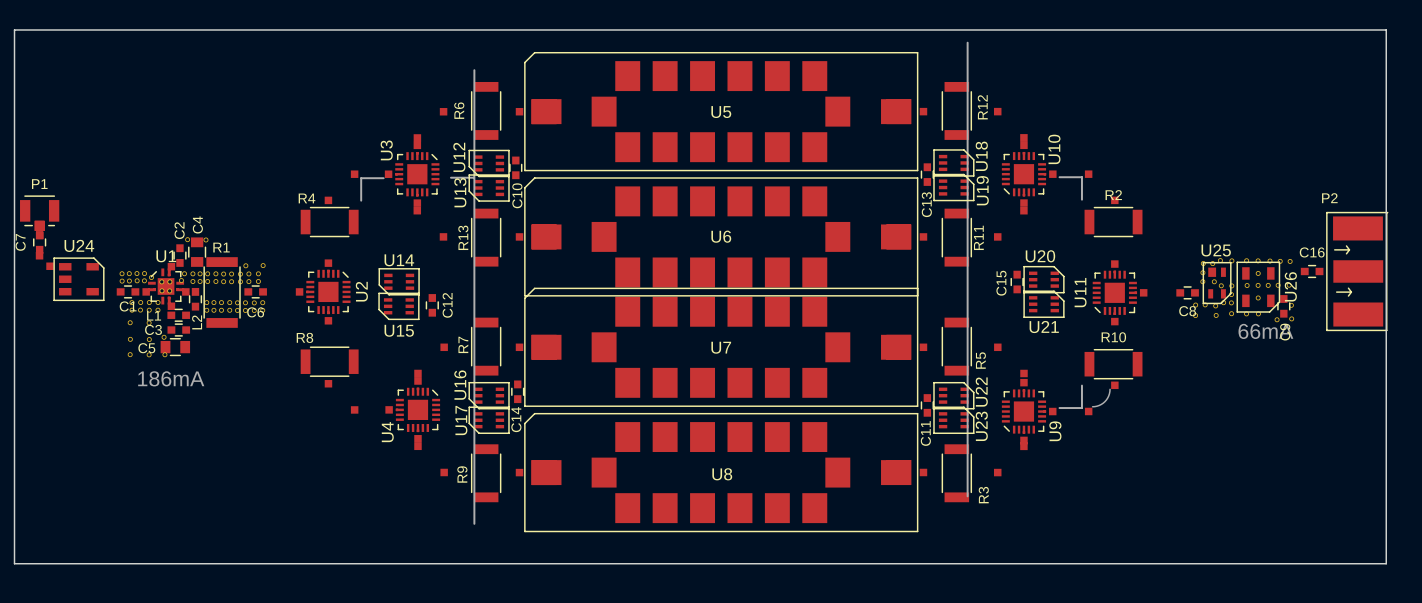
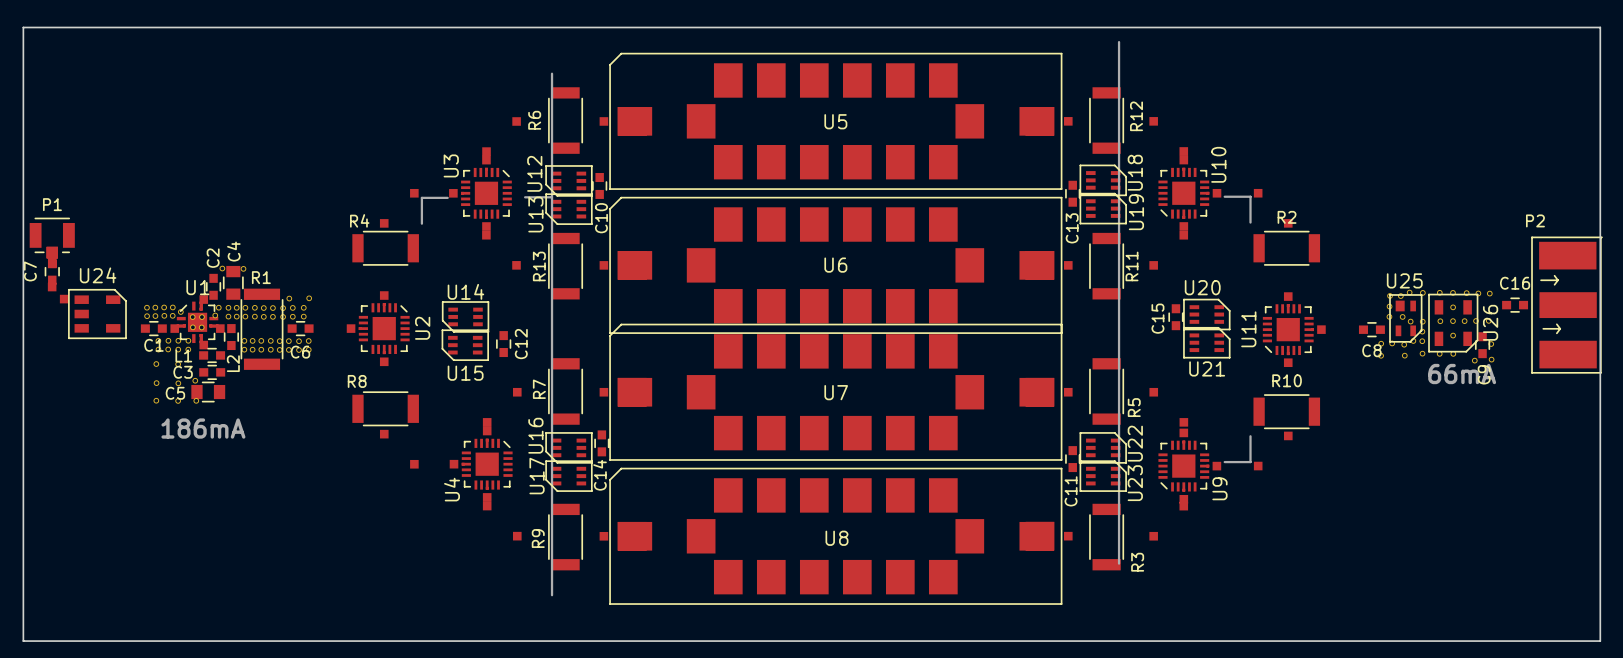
line: (1110, 389) (1104, 401) (1092, 406) -> none

